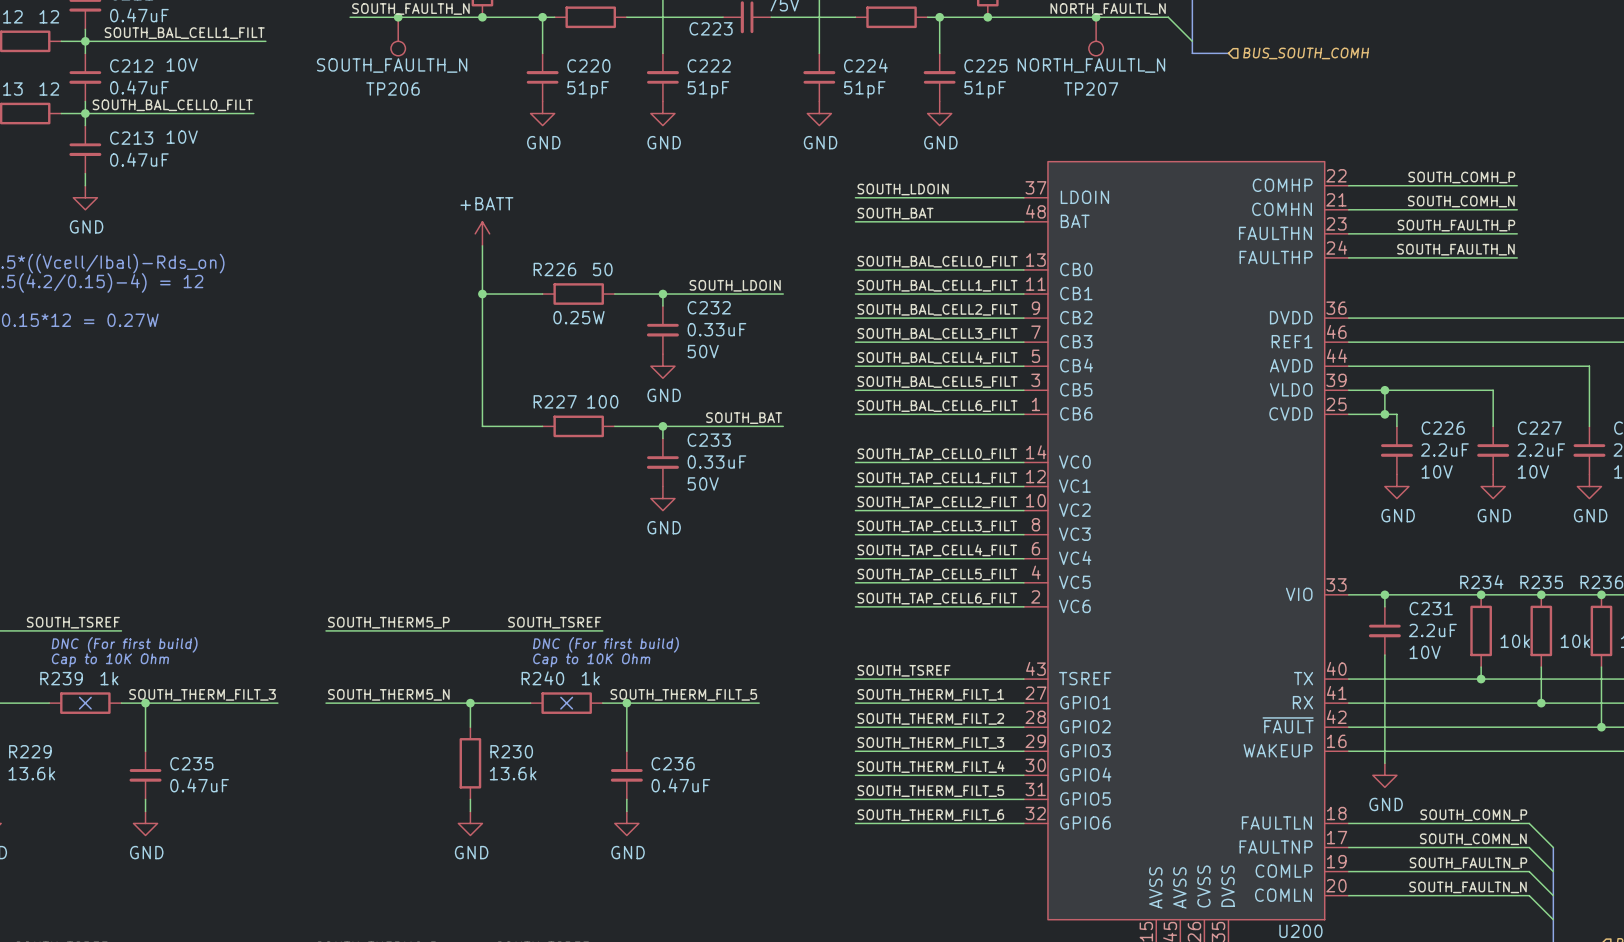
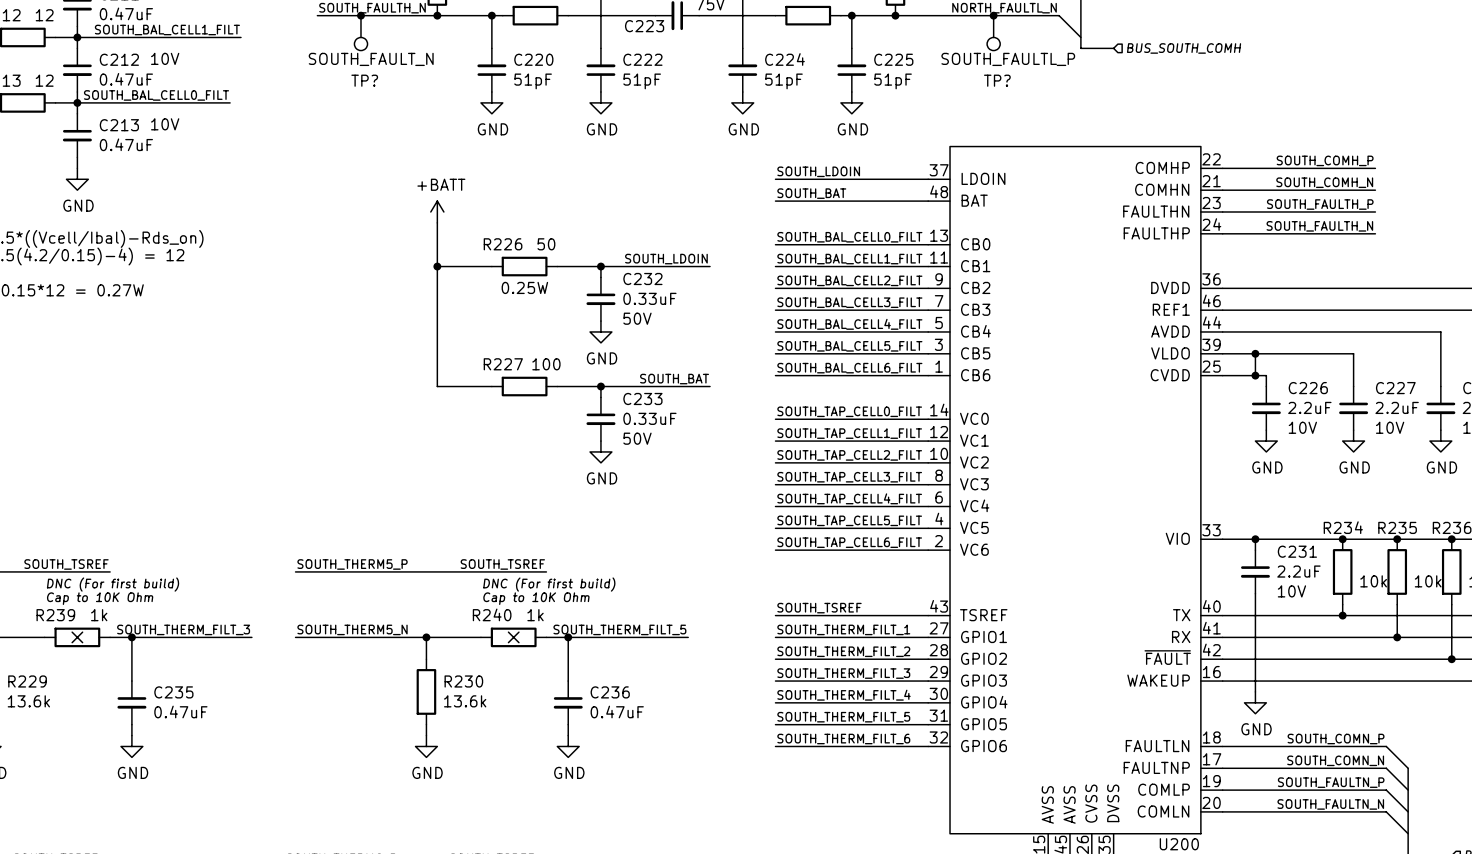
TP206 value: SOUTH_FAULTH_N (392, 65) -> SOUTH_FAULT_N (371, 59)
TP207 value: NORTH_FAULTL_N (1091, 65) -> SOUTH_FAULTL_P (1008, 59)
TP206 name: TP206 (392, 89) -> TP? (364, 80)
TP207 name: TP207 (1091, 89) -> TP? (997, 80)

